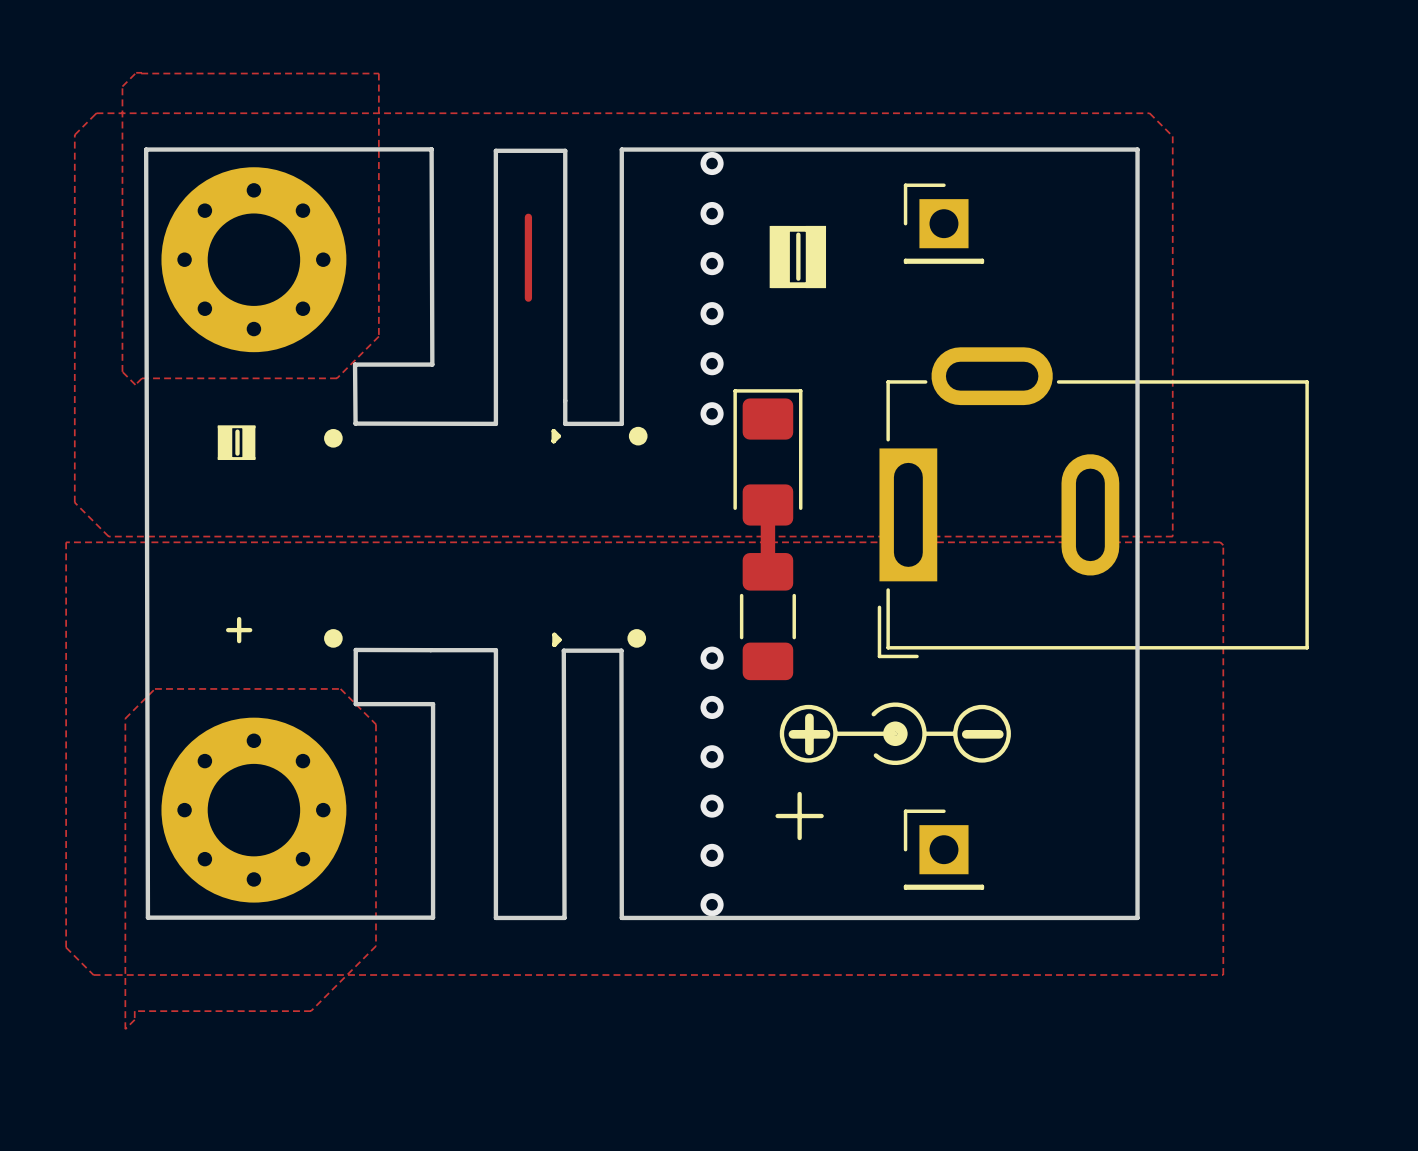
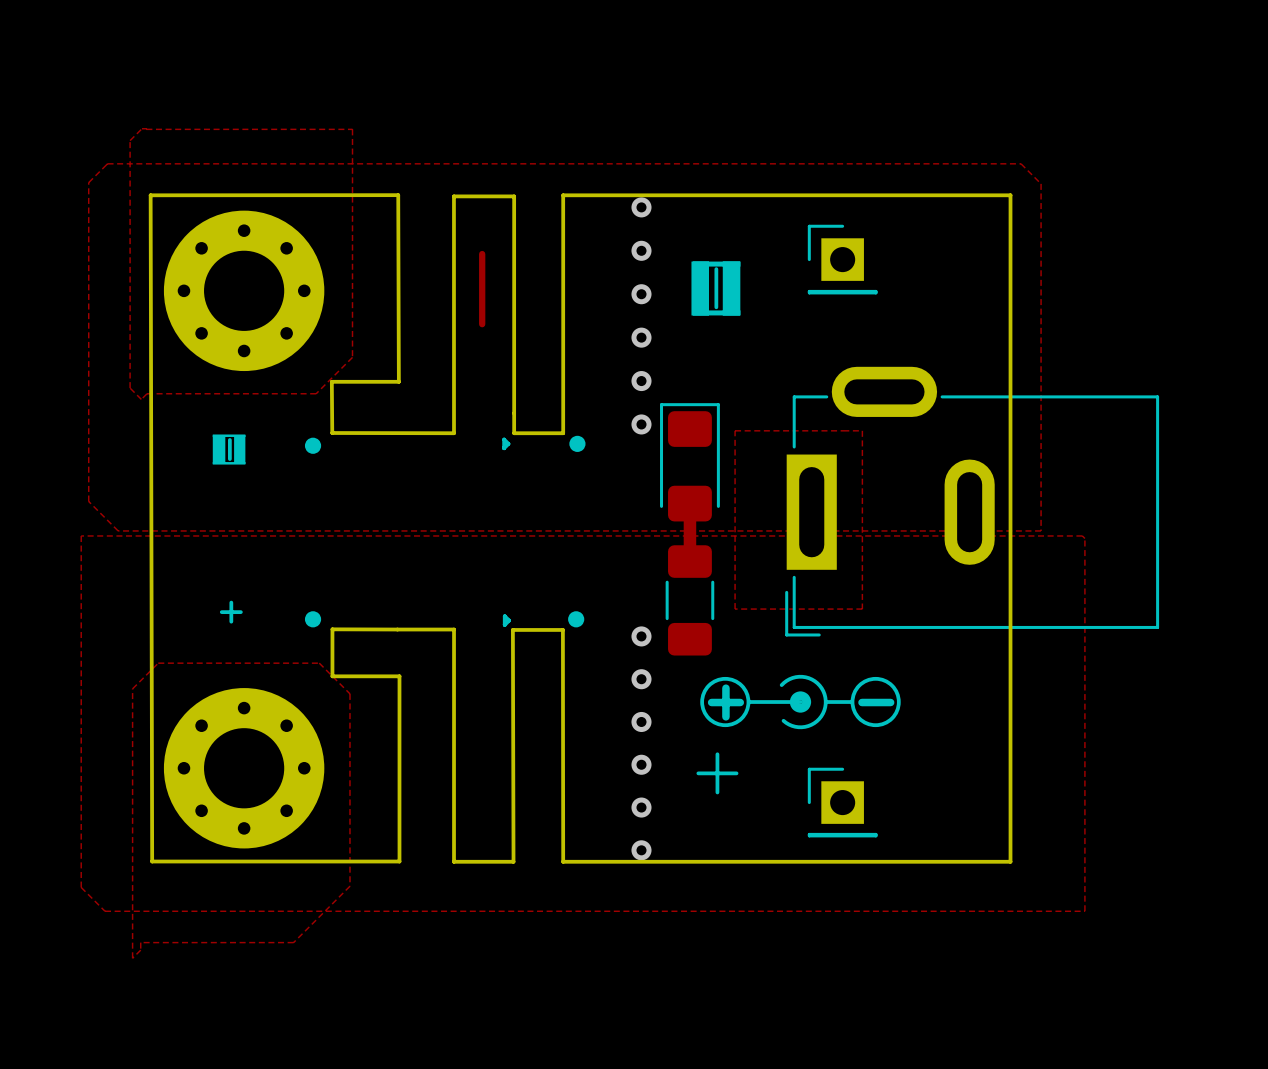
zone outline: none -> (735, 430) (862, 430) (862, 609) (735, 609) (735, 430)

